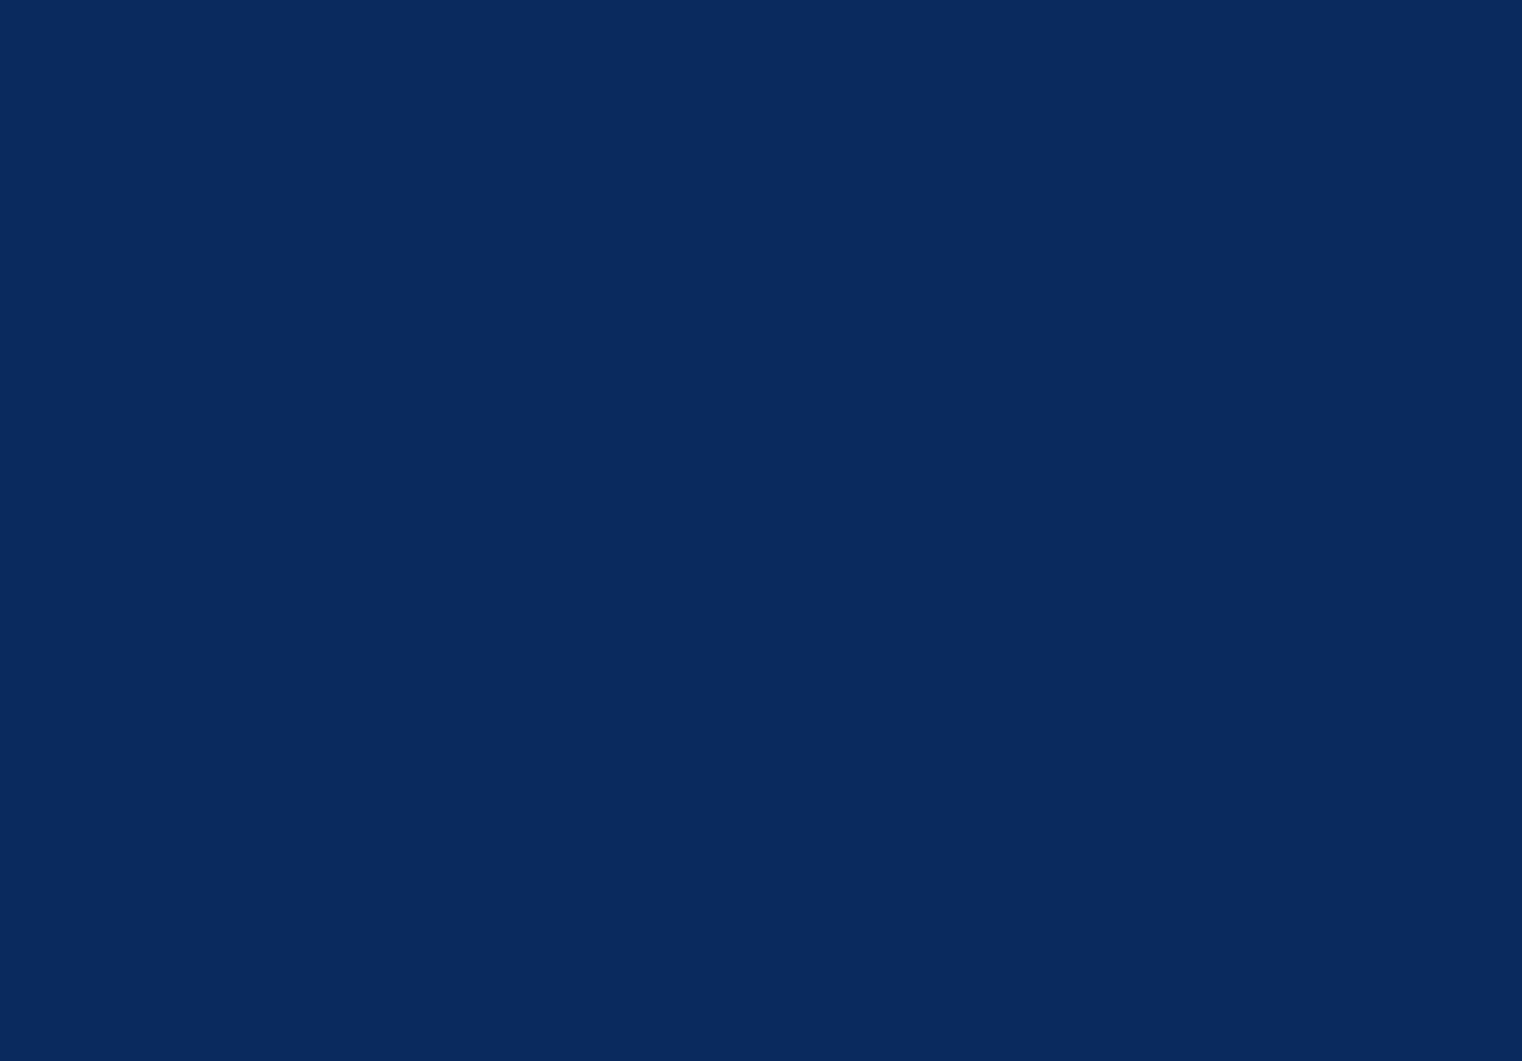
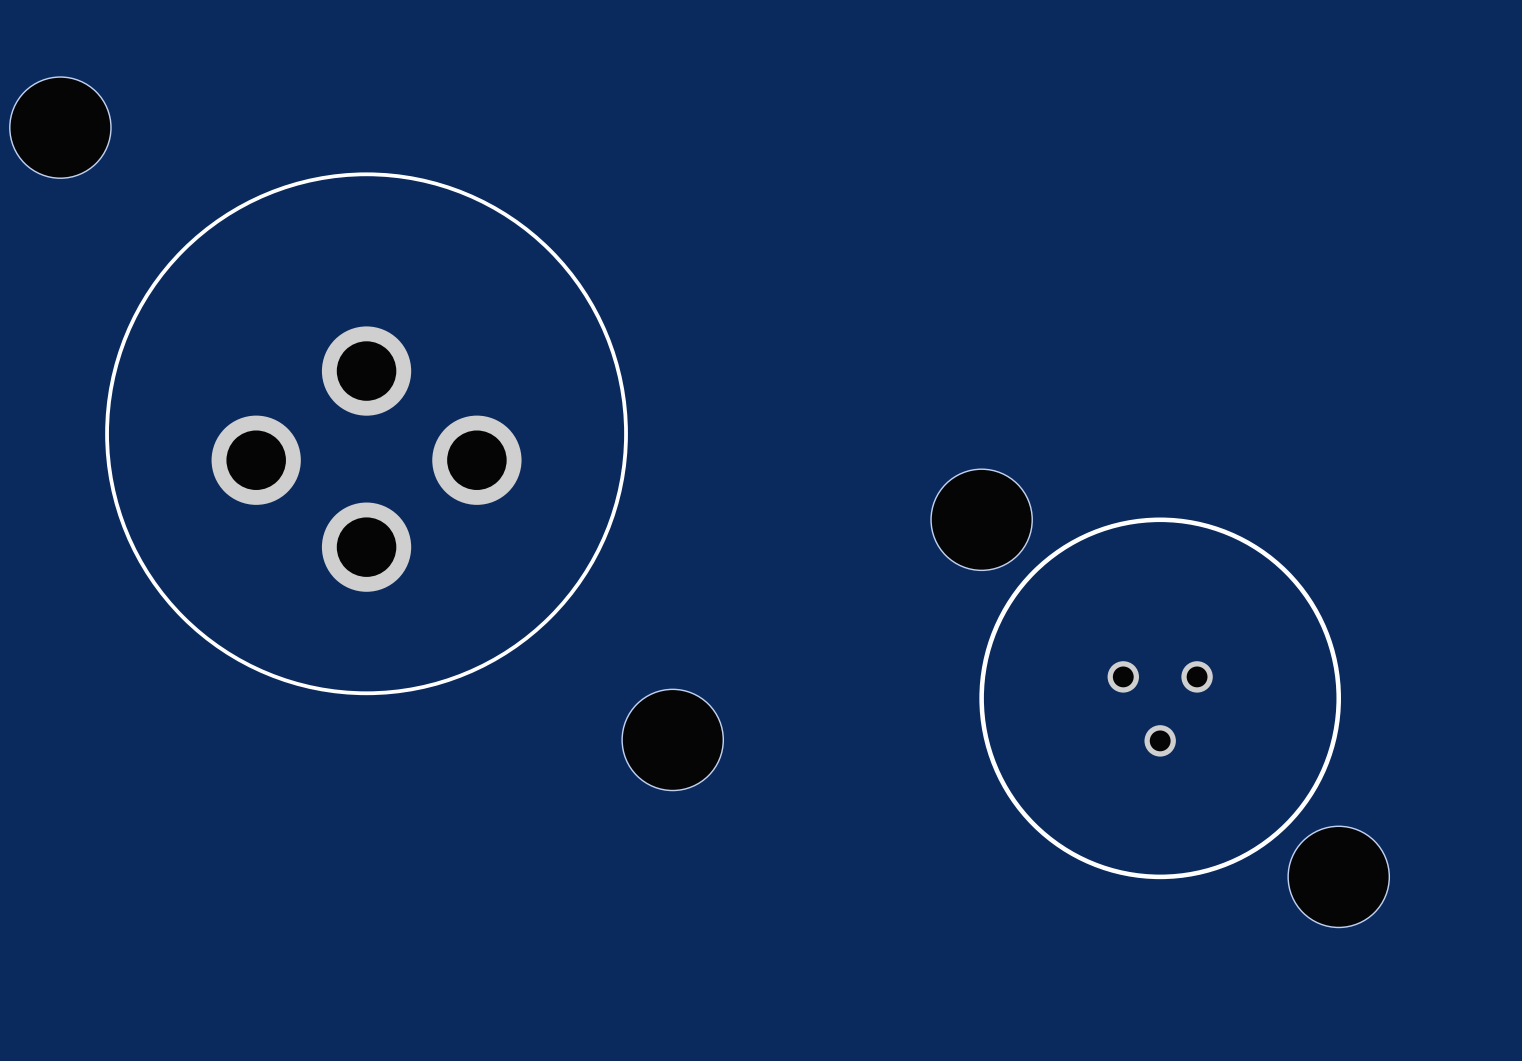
part: none -> (366, 433)
part: none -> (1160, 698)

